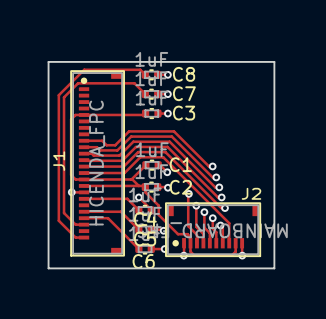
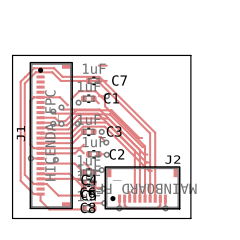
track: (145, 74) (140, 69) (84, 69) (75, 78) -> none
C8 position: (151, 74) -> (88, 208)
via: (167, 74) -> none
C8 name position: C8 (184, 74) -> C8 (87, 207)
track: (98, 83) (134, 83) (145, 94) -> (52, 72) (60, 80) (97, 80) (150, 133) (150, 186)
via: (167, 94) -> none
track: (145, 113) (108, 114) -> (67, 105) (59, 97)
C3 position: (151, 113) -> (88, 131)
track: none -> (93, 98) (98, 103)
via: none -> (78, 102)
via: none -> (61, 107)
via: none -> (53, 111)
via: none -> (53, 123)
via: none -> (61, 123)
via: none -> (77, 123)
track: (138, 158) (163, 157) (229, 223) -> (34, 68) (54, 68) (62, 76) (99, 76) (155, 132) (155, 182)
via: none -> (101, 131)
track: (145, 165) (131, 179) -> none
C1 position: (152, 165) -> (88, 98)
via: (212, 166) -> none
via: (216, 177) -> none
track: (127, 185) (144, 185) (145, 192) (158, 205) (158, 214) (178, 234) (187, 234) (190, 237) (190, 243) -> (75, 153) (83, 144)
via: (219, 187) -> none
track: (188, 193) (188, 226) (196, 234) -> none
via: (188, 193) -> none
via: none -> (55, 159)
via: (138, 197) -> none
via: (221, 197) -> none
track: (196, 205) (196, 226) (203, 233) -> (53, 111) (55, 113) (97, 113) (134, 150) (134, 191)
via: (196, 205) -> none
via: none -> (101, 170)
via: (225, 208) -> none
track: (204, 212) (204, 227) (209, 233) -> (61, 107) (63, 109) (99, 109) (139, 149) (139, 190)
via: (204, 212) -> none
track: (108, 218) (138, 249) -> (59, 178) (79, 178) (83, 182)
track: (212, 218) (212, 228) (216, 232) -> (71, 99) (79, 91) (95, 91) (104, 100) (104, 106) (145, 146) (145, 189)
via: (212, 218) -> none
track: none -> (40, 183) (46, 183) (58, 195) (83, 195)
via: (220, 225) -> none
track: none -> (40, 194) (40, 200) (49, 209) (83, 208)
C6 position: (145, 249) -> (88, 182)

